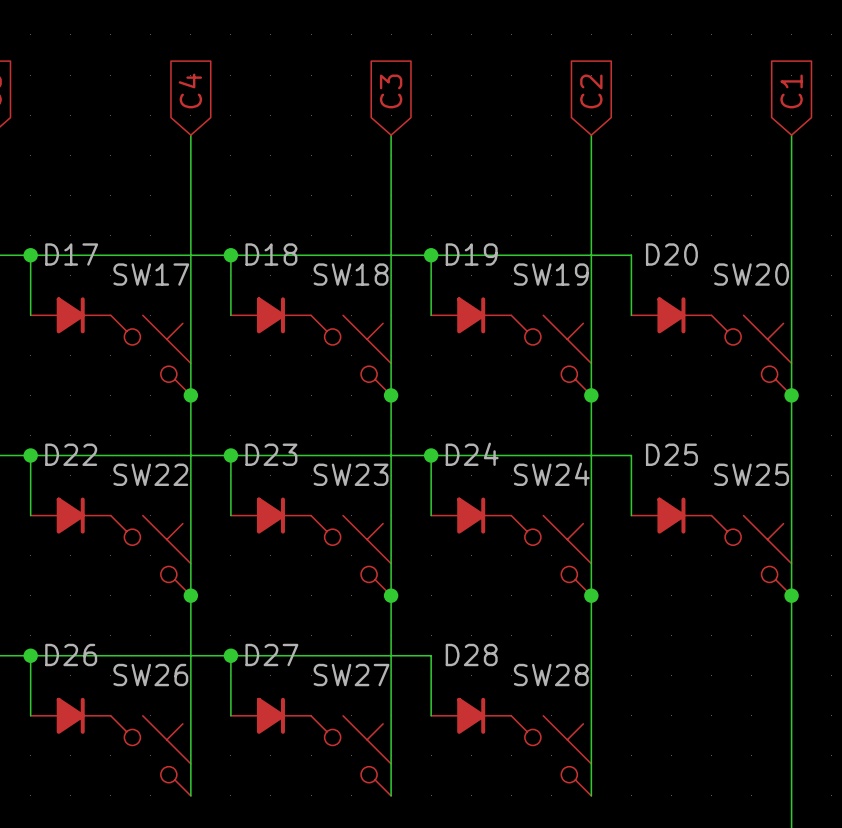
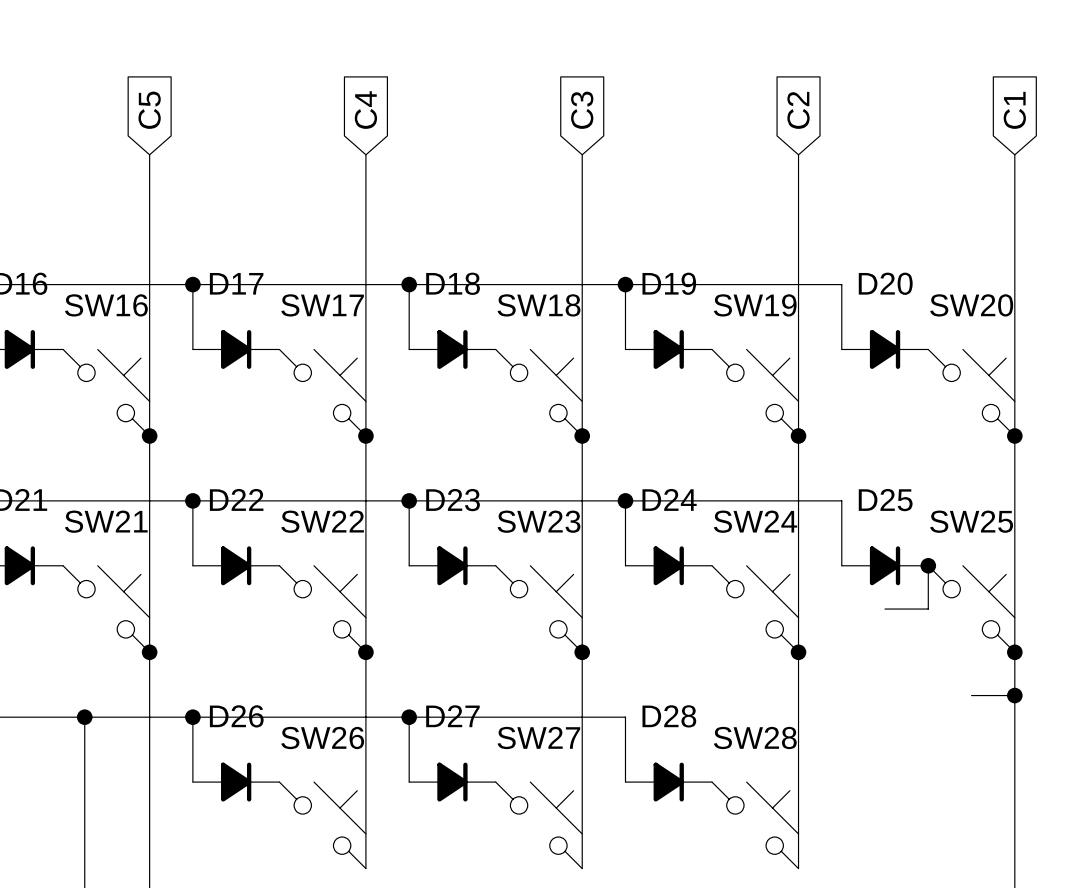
wire: none -> (928, 565) (928, 609) (885, 609)
junction: none -> (928, 565)
wire: none -> (971, 695) (1014, 695)
junction: none -> (1014, 695)

